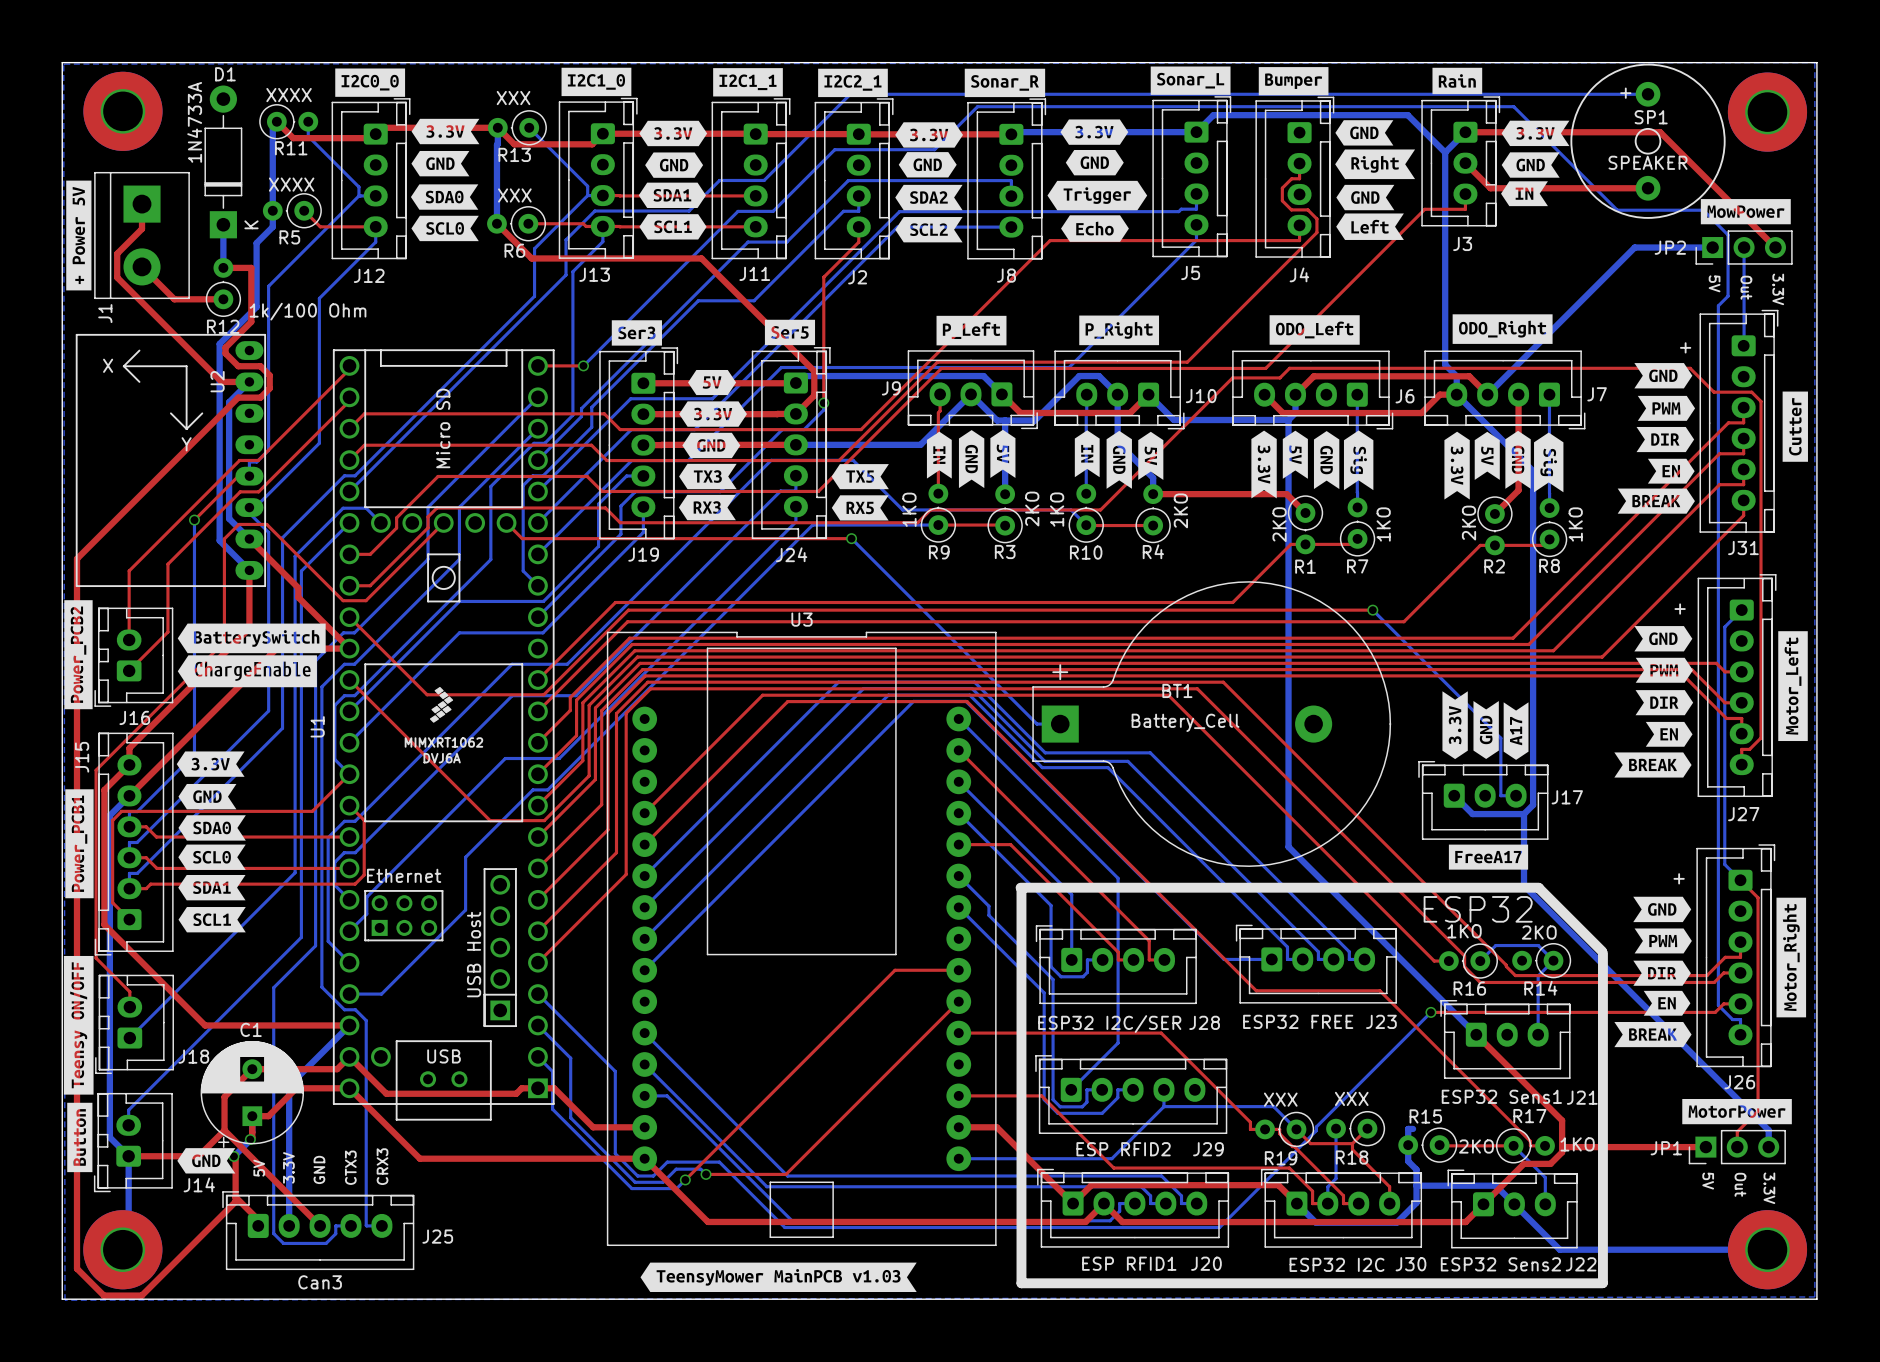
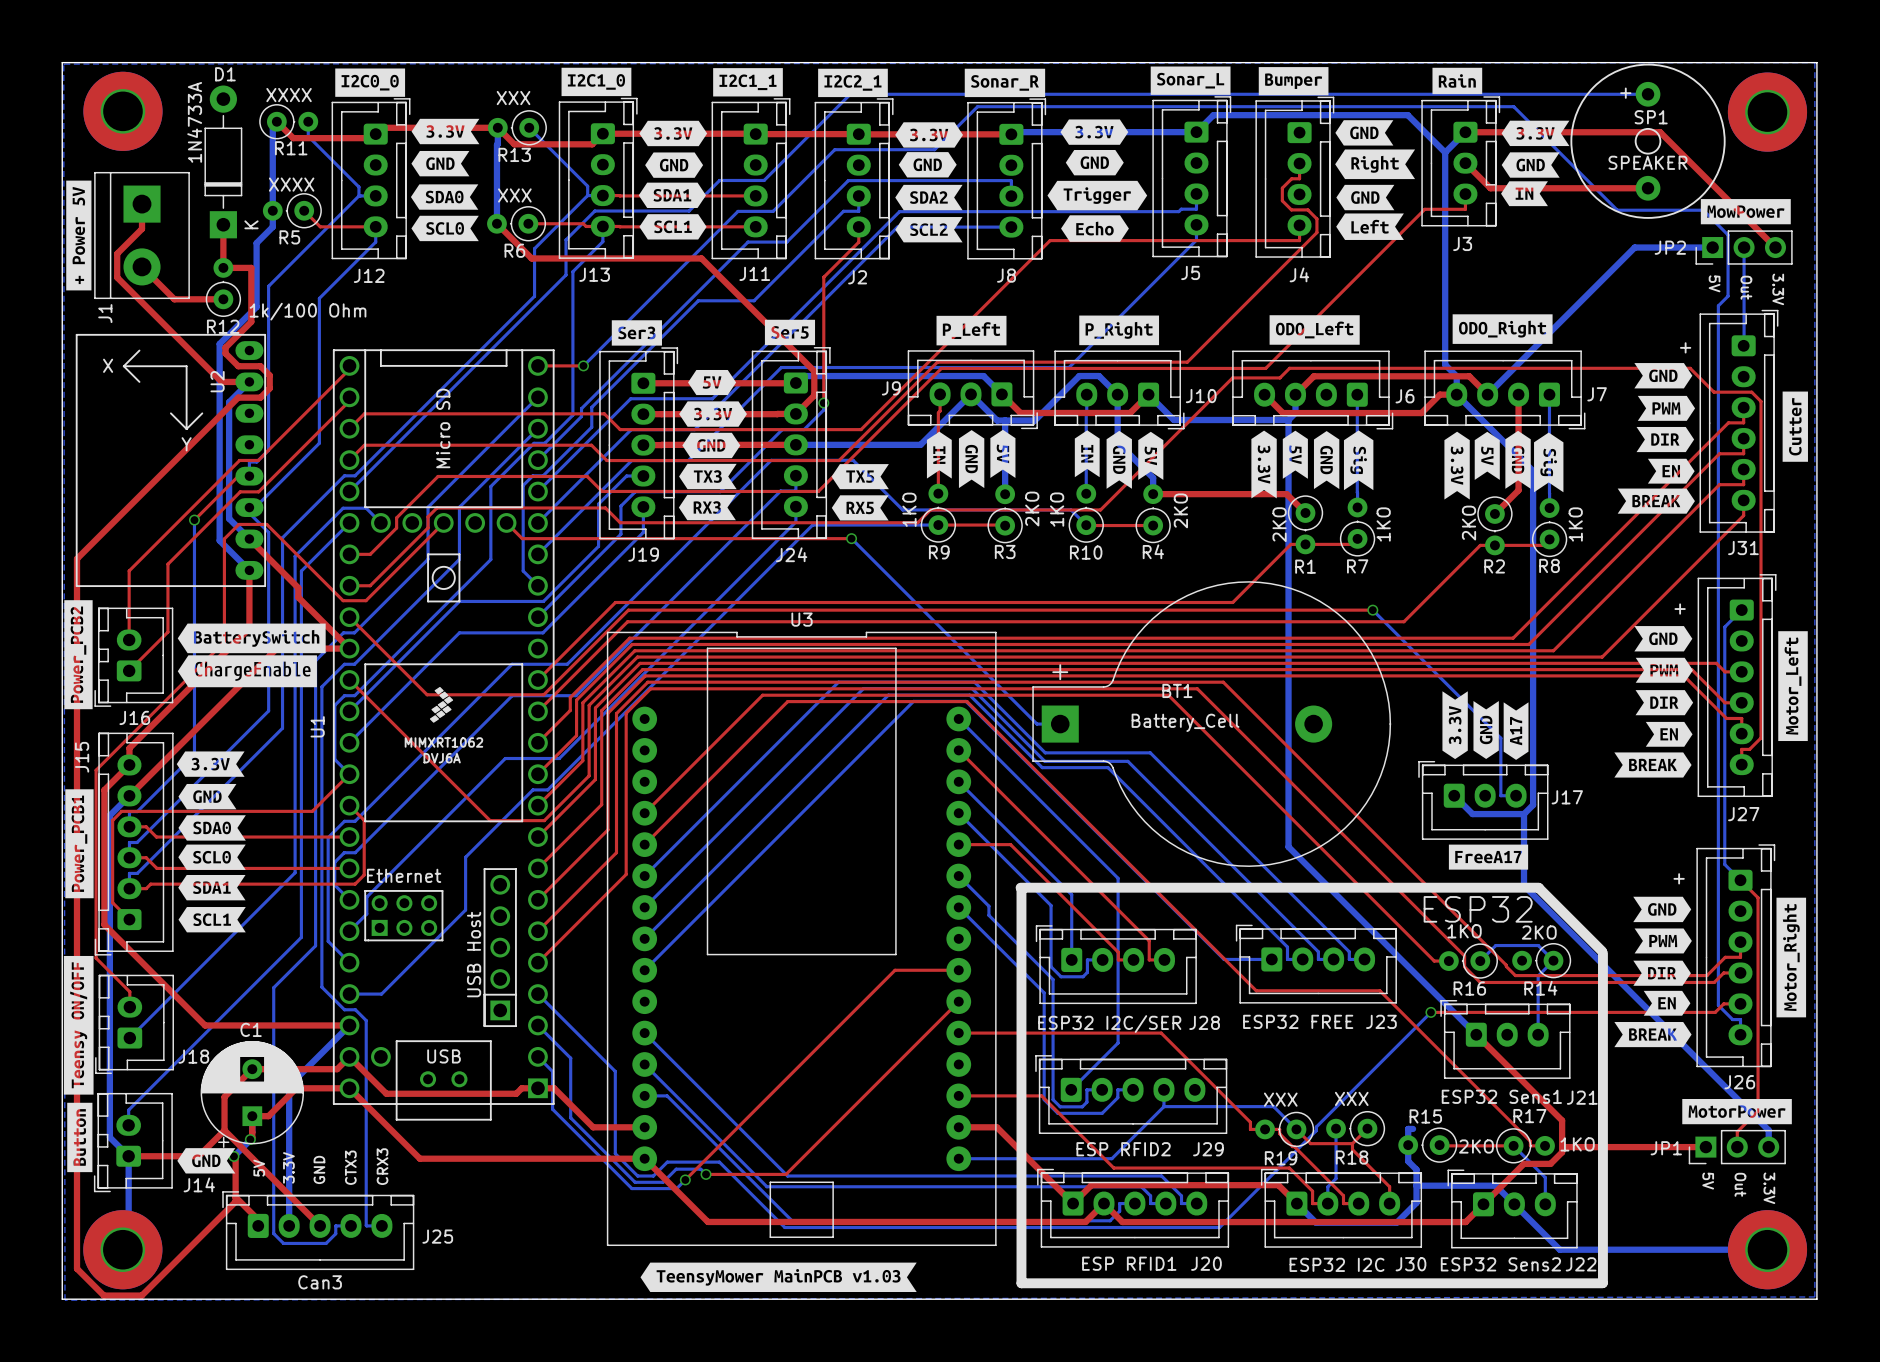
top track: none -> (223, 224) (223, 267)
bottom track: (223, 224) (223, 267) -> none

